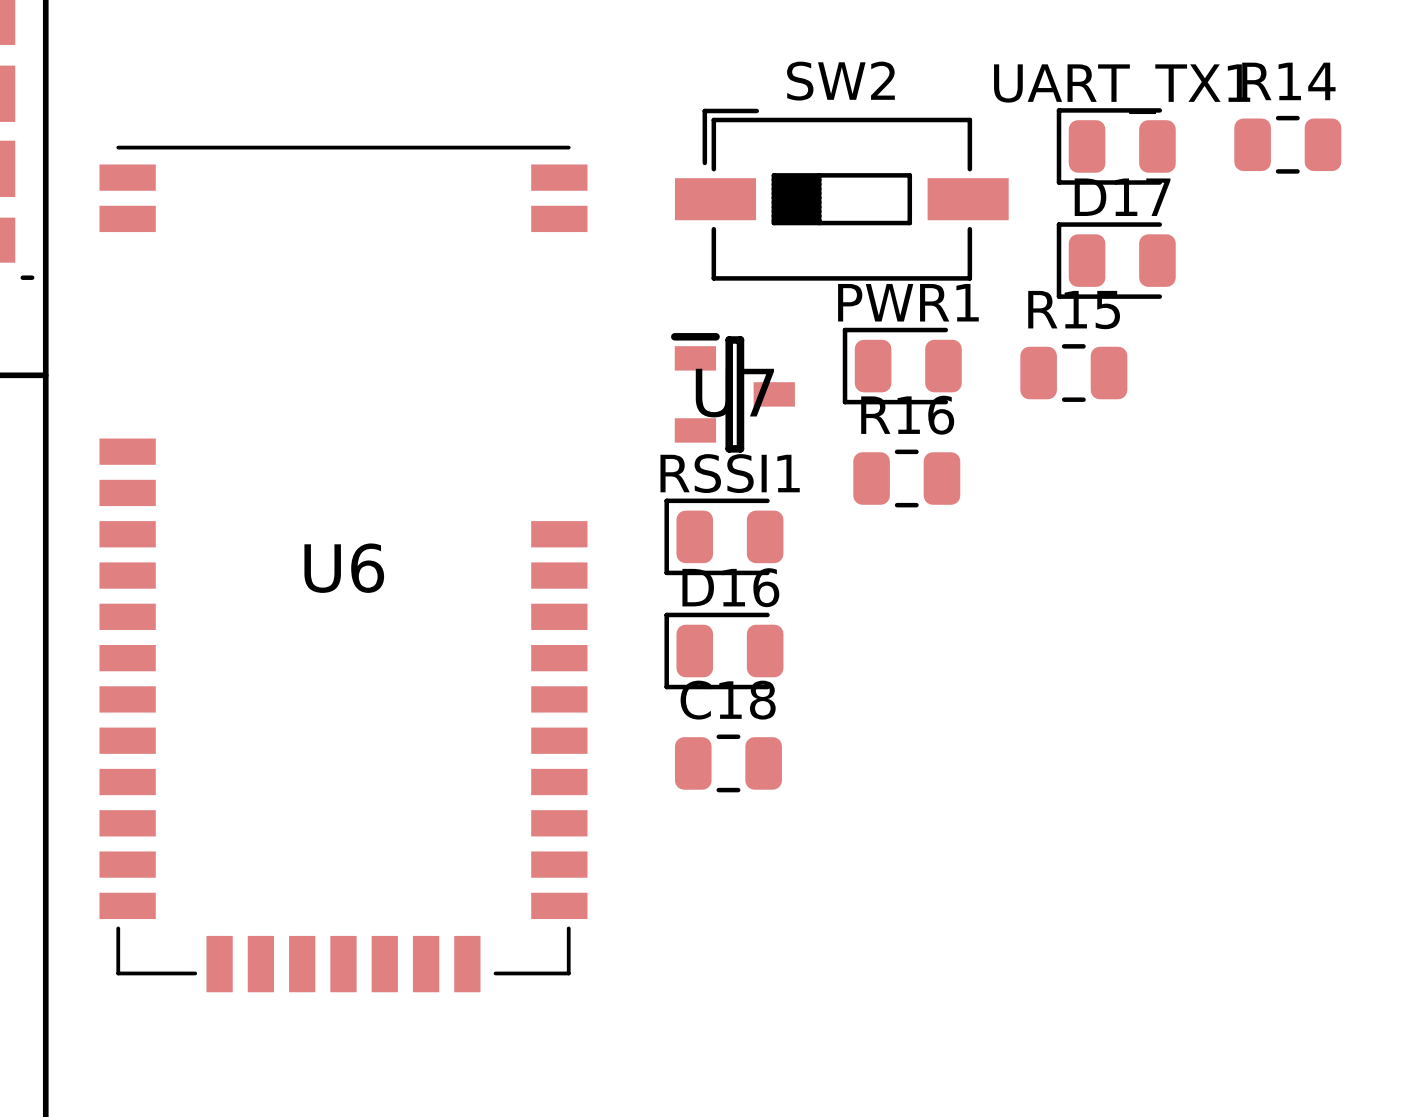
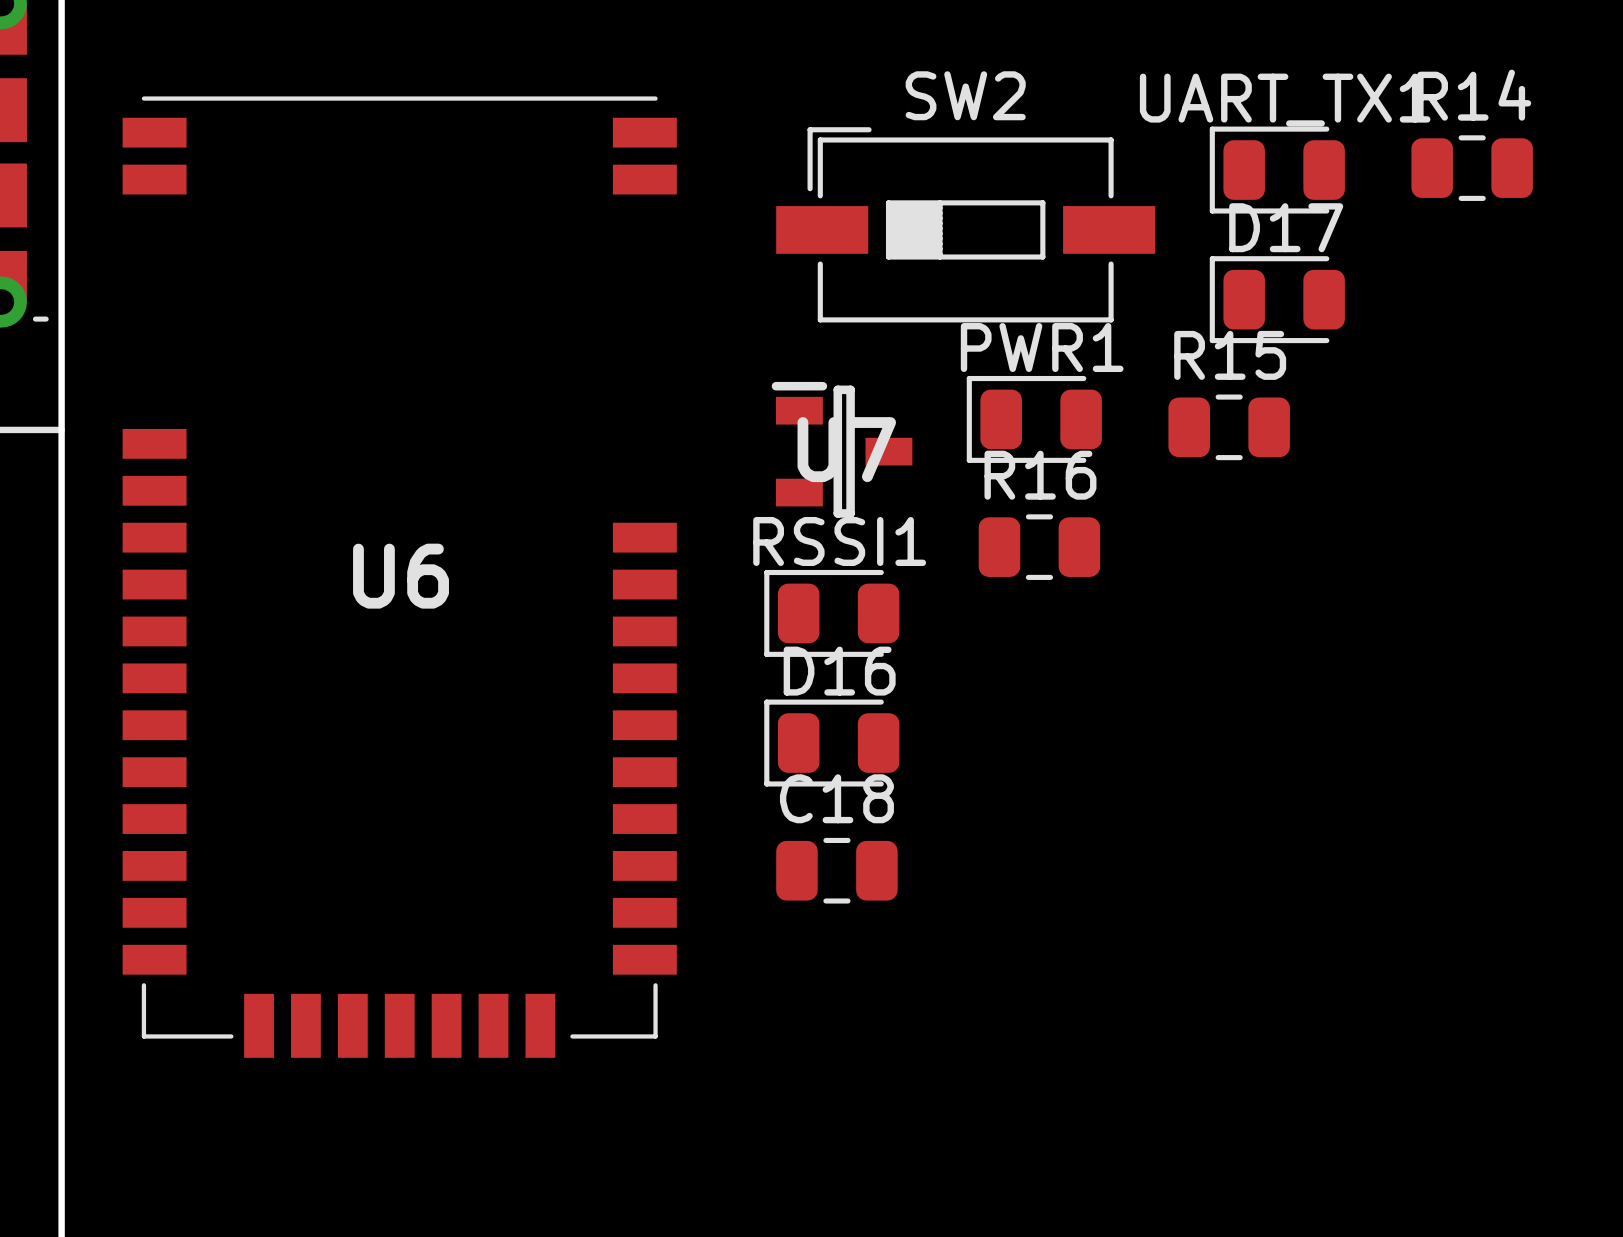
U6 position: (343, 568) -> (399, 577)

